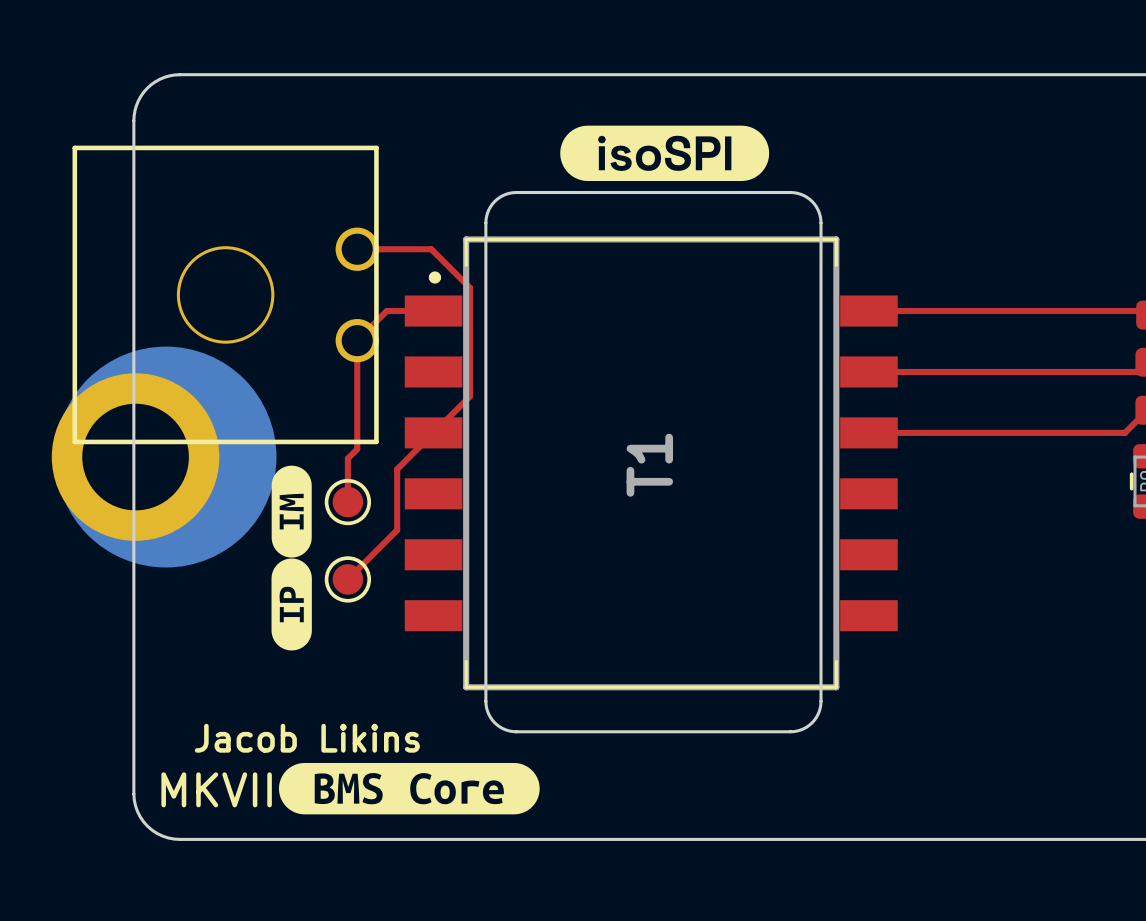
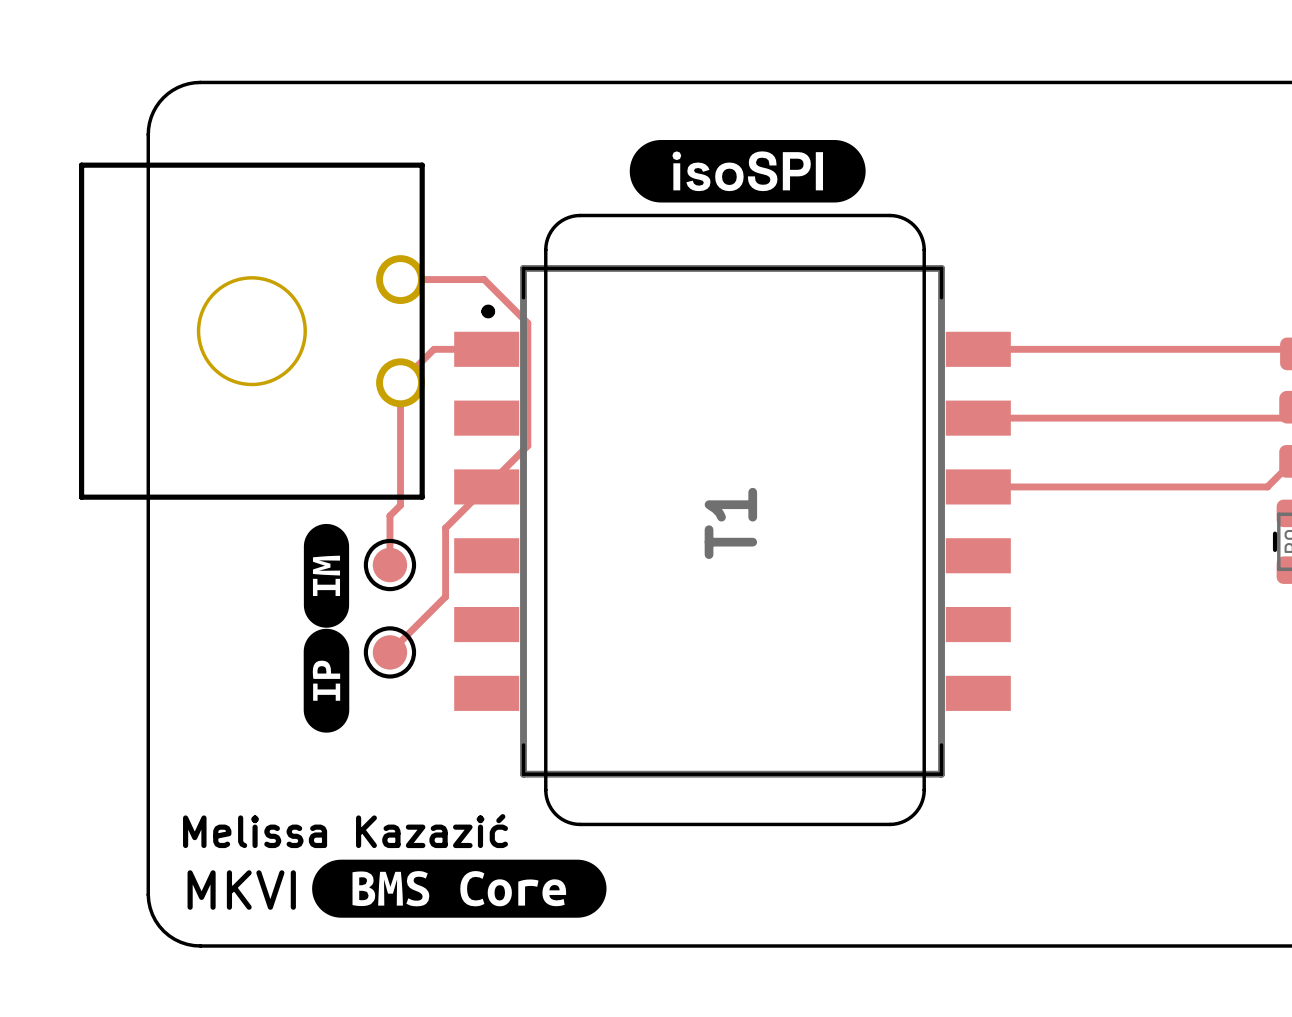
part: (164, 457) -> none
text: Jacob Likins (307, 738) -> Melissa Kazazić (345, 831)
text: MKVII (216, 789) -> MKVI (241, 890)

